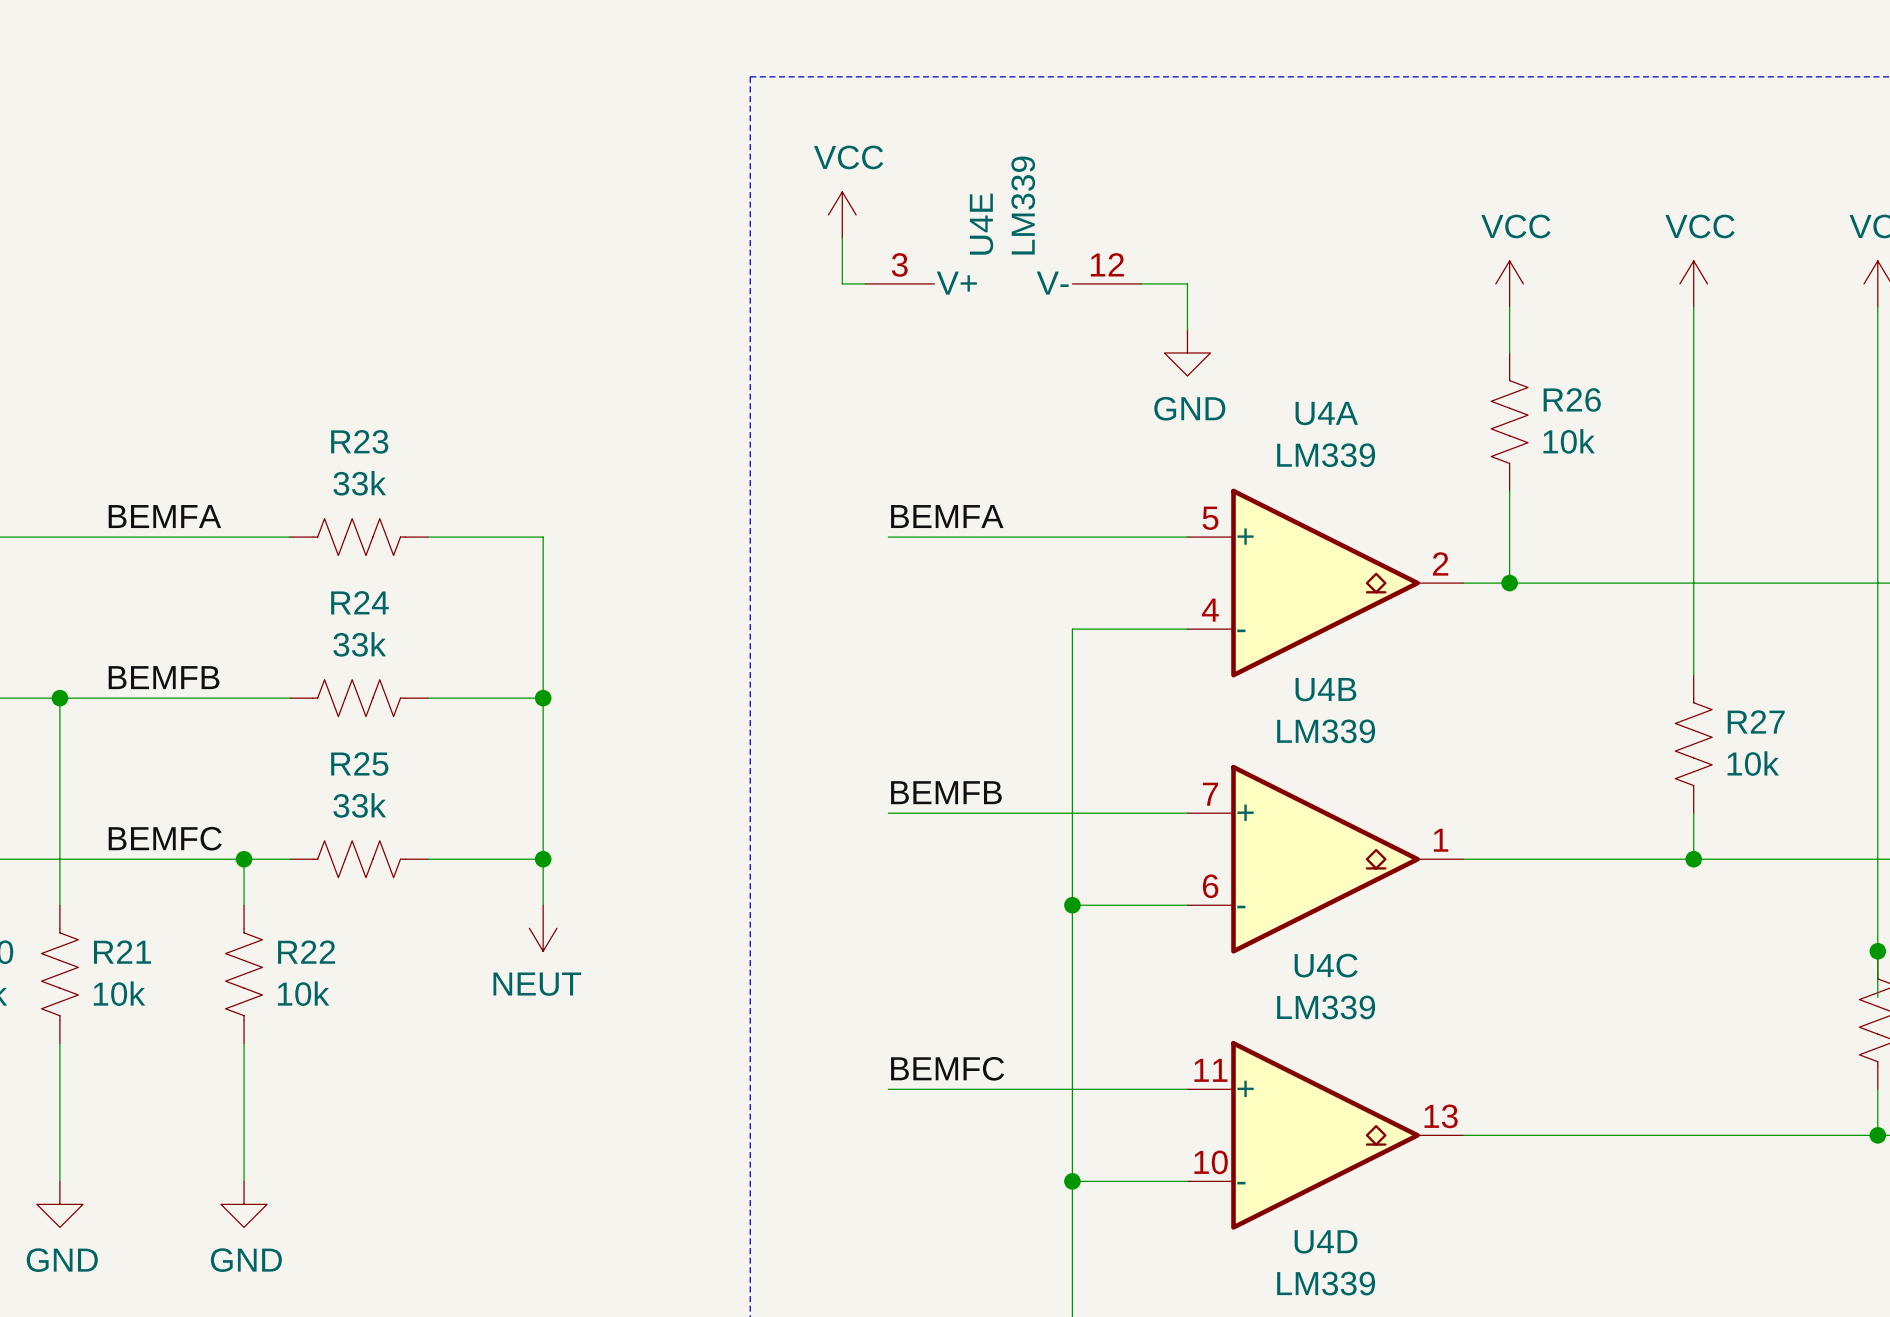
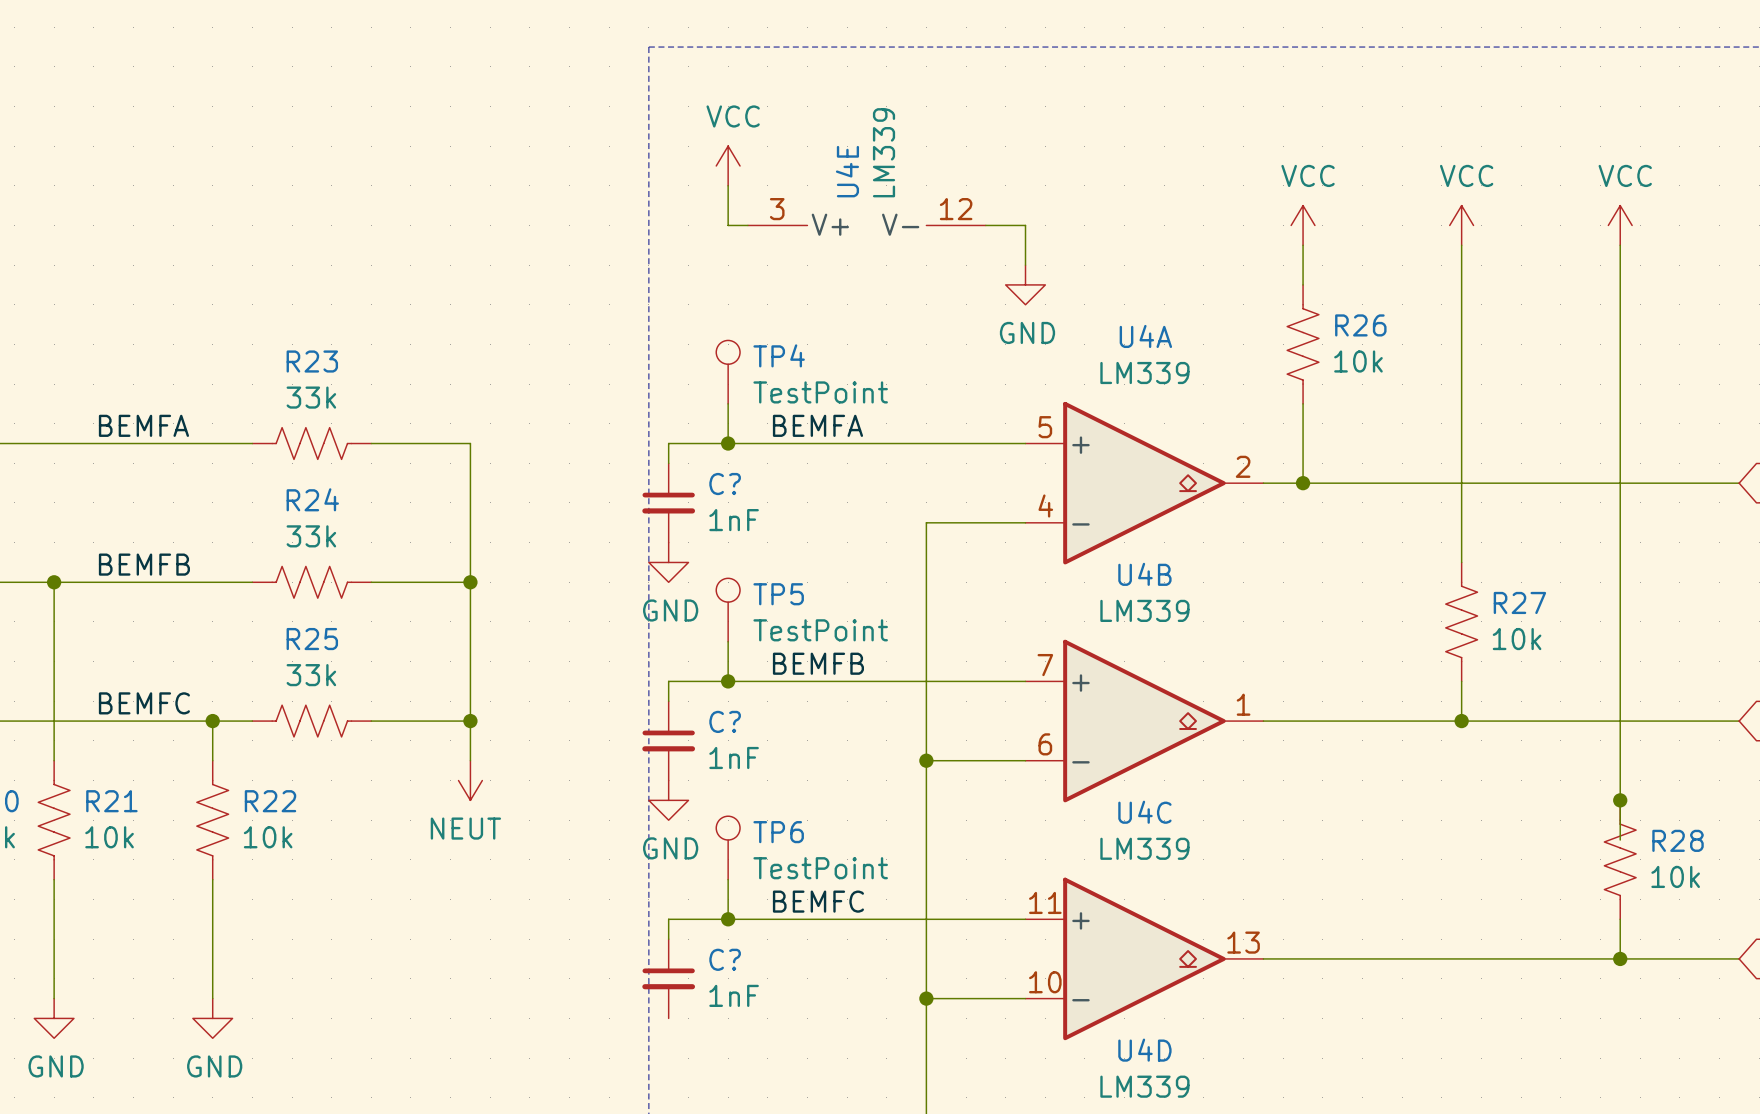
TP4: none -> TestPoint (728, 372)
wire: none -> (728, 403) (728, 443)
junction: none -> (728, 443)
wire: none -> (767, 443) (668, 443) (668, 463)
C?: none -> 1nF (668, 502)
power symbol: none -> GND (668, 562)
TP5: none -> TestPoint (728, 610)
wire: none -> (728, 641) (728, 681)
junction: none -> (728, 681)
wire: none -> (767, 681) (668, 681) (668, 701)
C?: none -> 1nF (668, 740)
power symbol: none -> GND (668, 800)
TP6: none -> TestPoint (728, 847)
wire: none -> (728, 879) (728, 919)
junction: none -> (728, 919)
wire: none -> (767, 919) (668, 919) (668, 939)
C?: none -> 1nF (668, 978)

